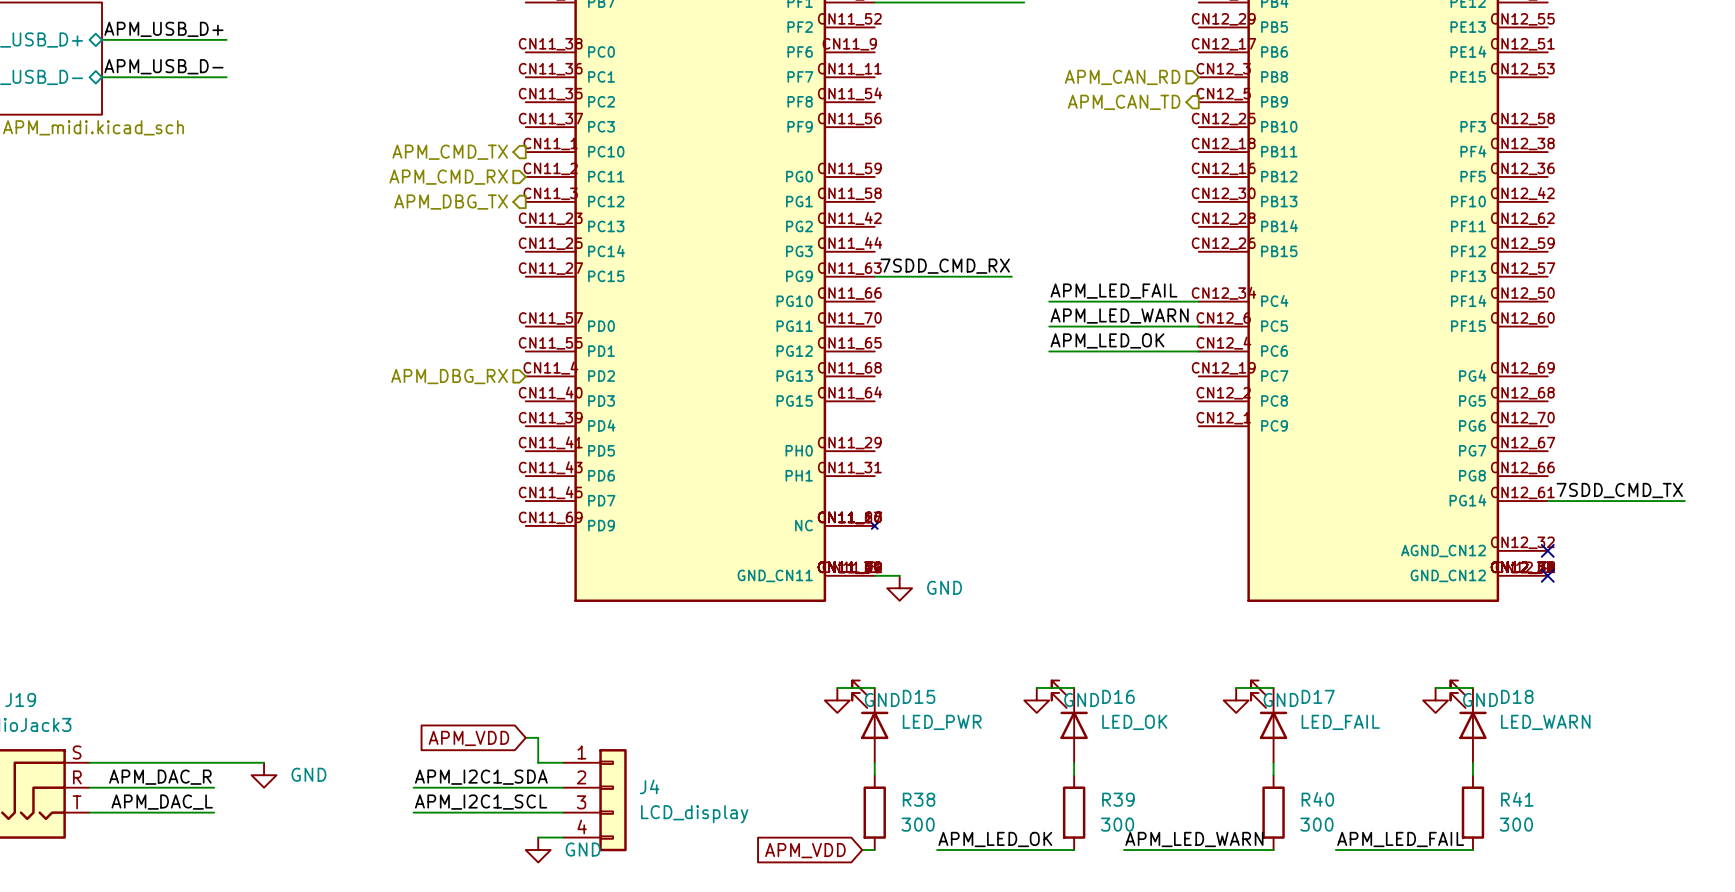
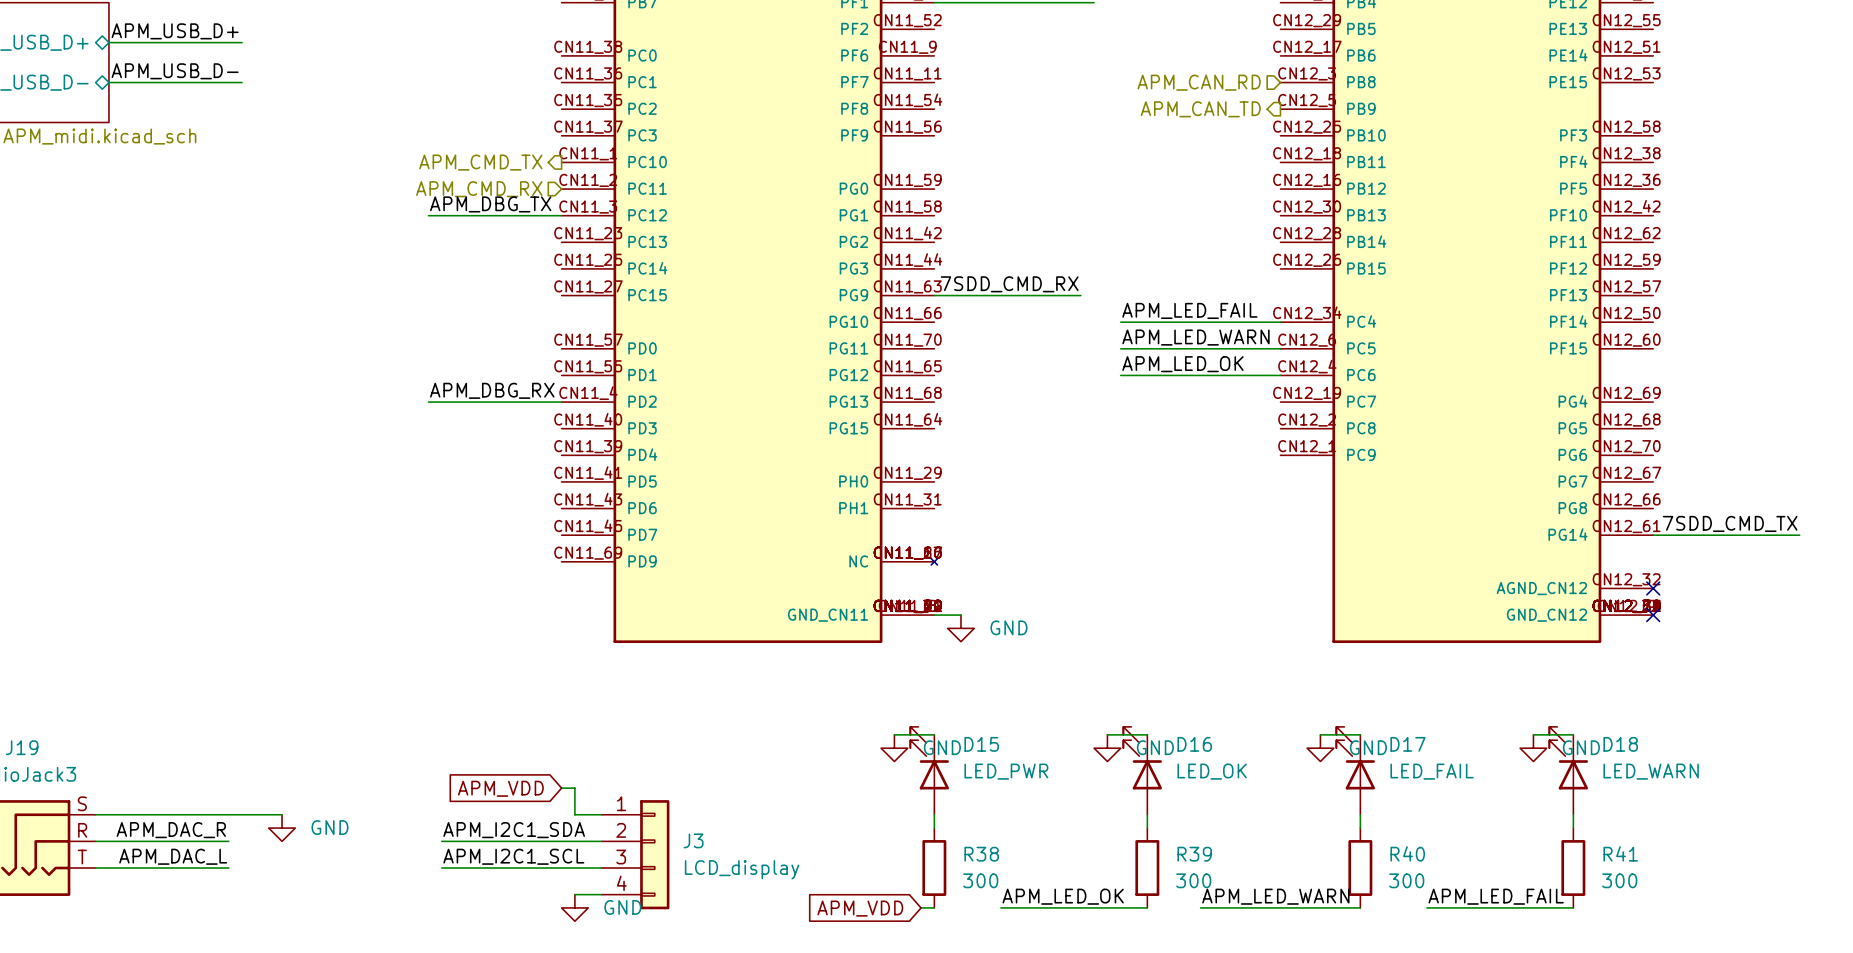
label: none -> APM_DBG_TX (490, 204)
wire: none -> (428, 215) (561, 215)
hierarchical label: APM_DBG_TX (451, 202) -> none
label: none -> APM_DBG_RX (492, 390)
wire: none -> (428, 402) (561, 402)
hierarchical label: APM_DBG_RX (449, 376) -> none
J4 name: J4 (649, 786) -> J3 (693, 840)

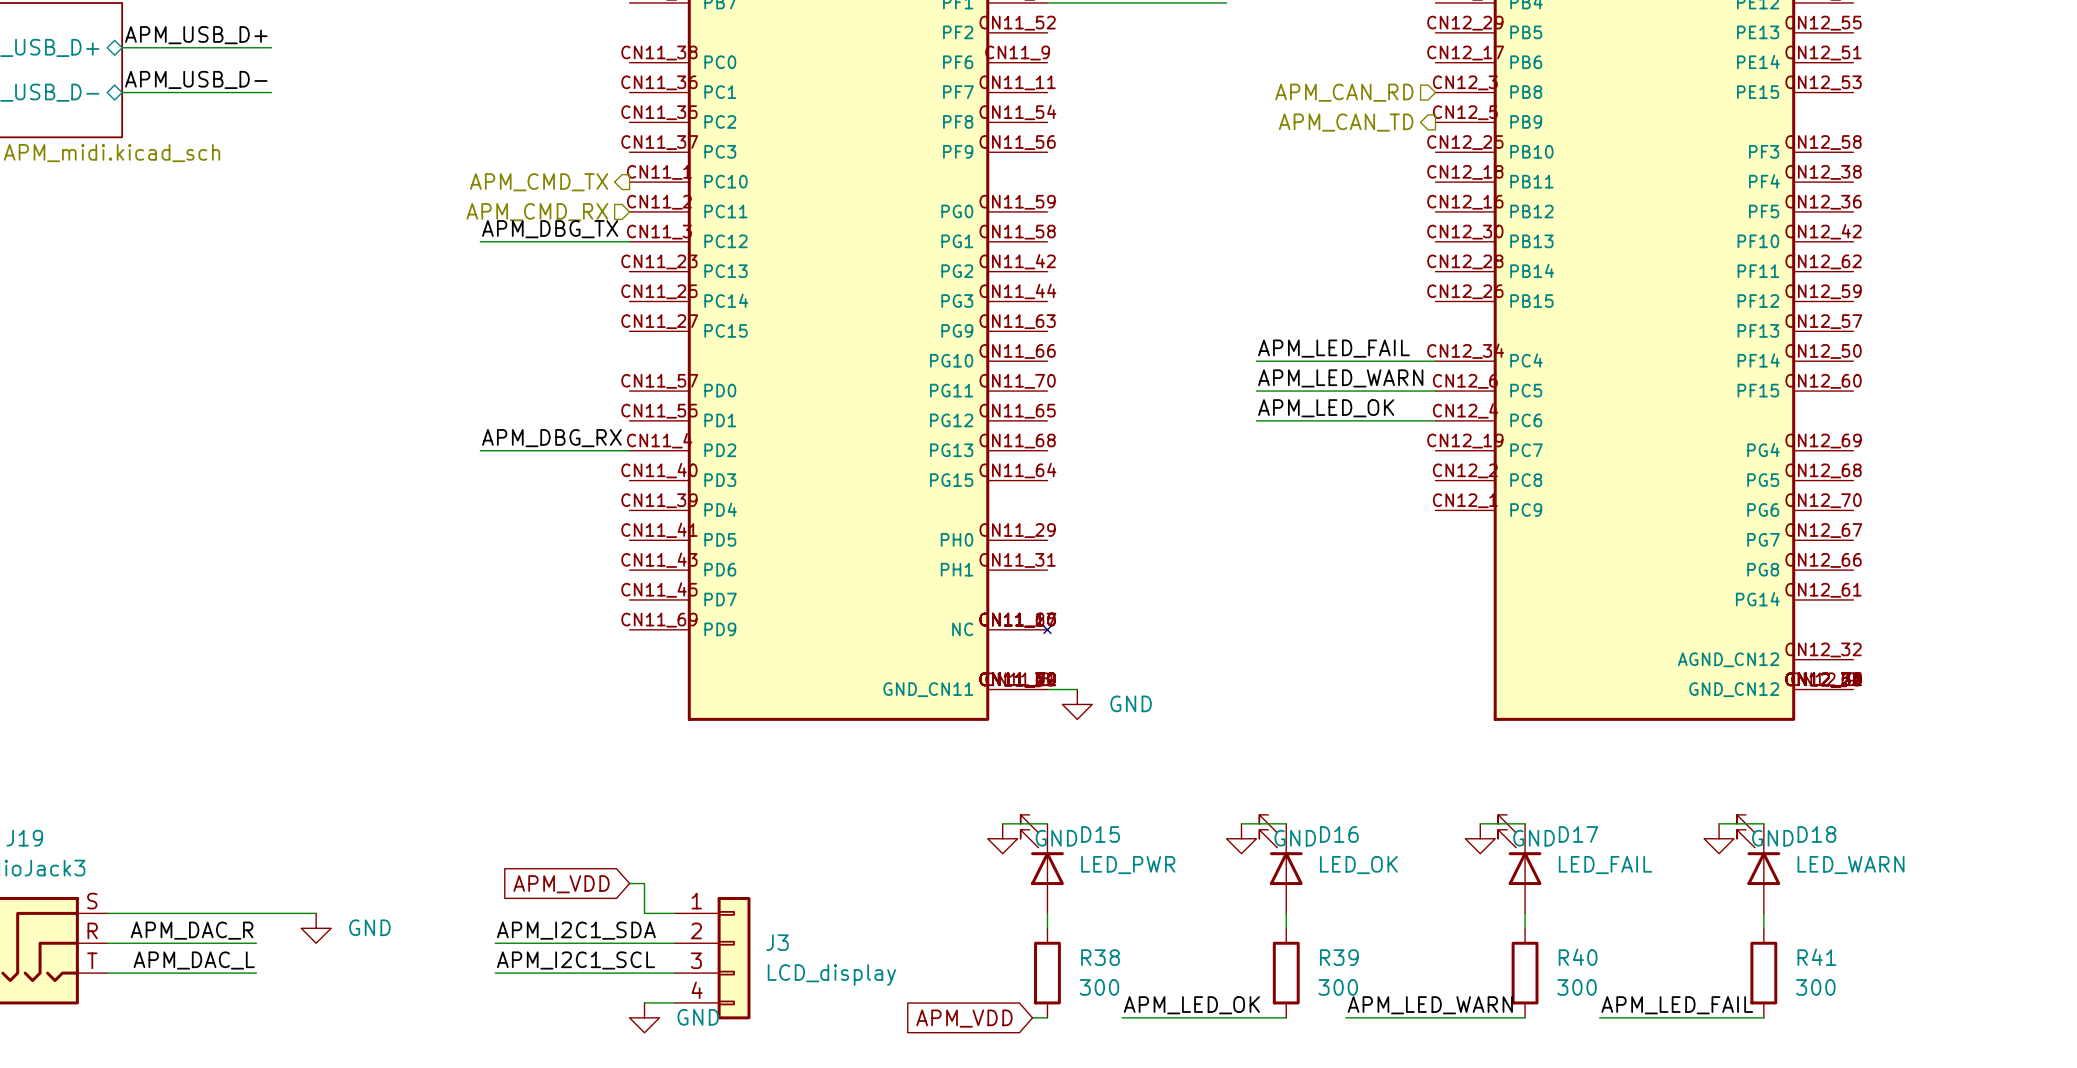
label: 7SDD_CMD_RX (1009, 284) -> none
wire: (934, 295) (1080, 295) -> none
label: 7SDD_CMD_TX (1730, 523) -> none
wire: (1653, 535) (1799, 535) -> none
no-connect mark: (1653, 588) -> none
no-connect mark: (1653, 615) -> none

